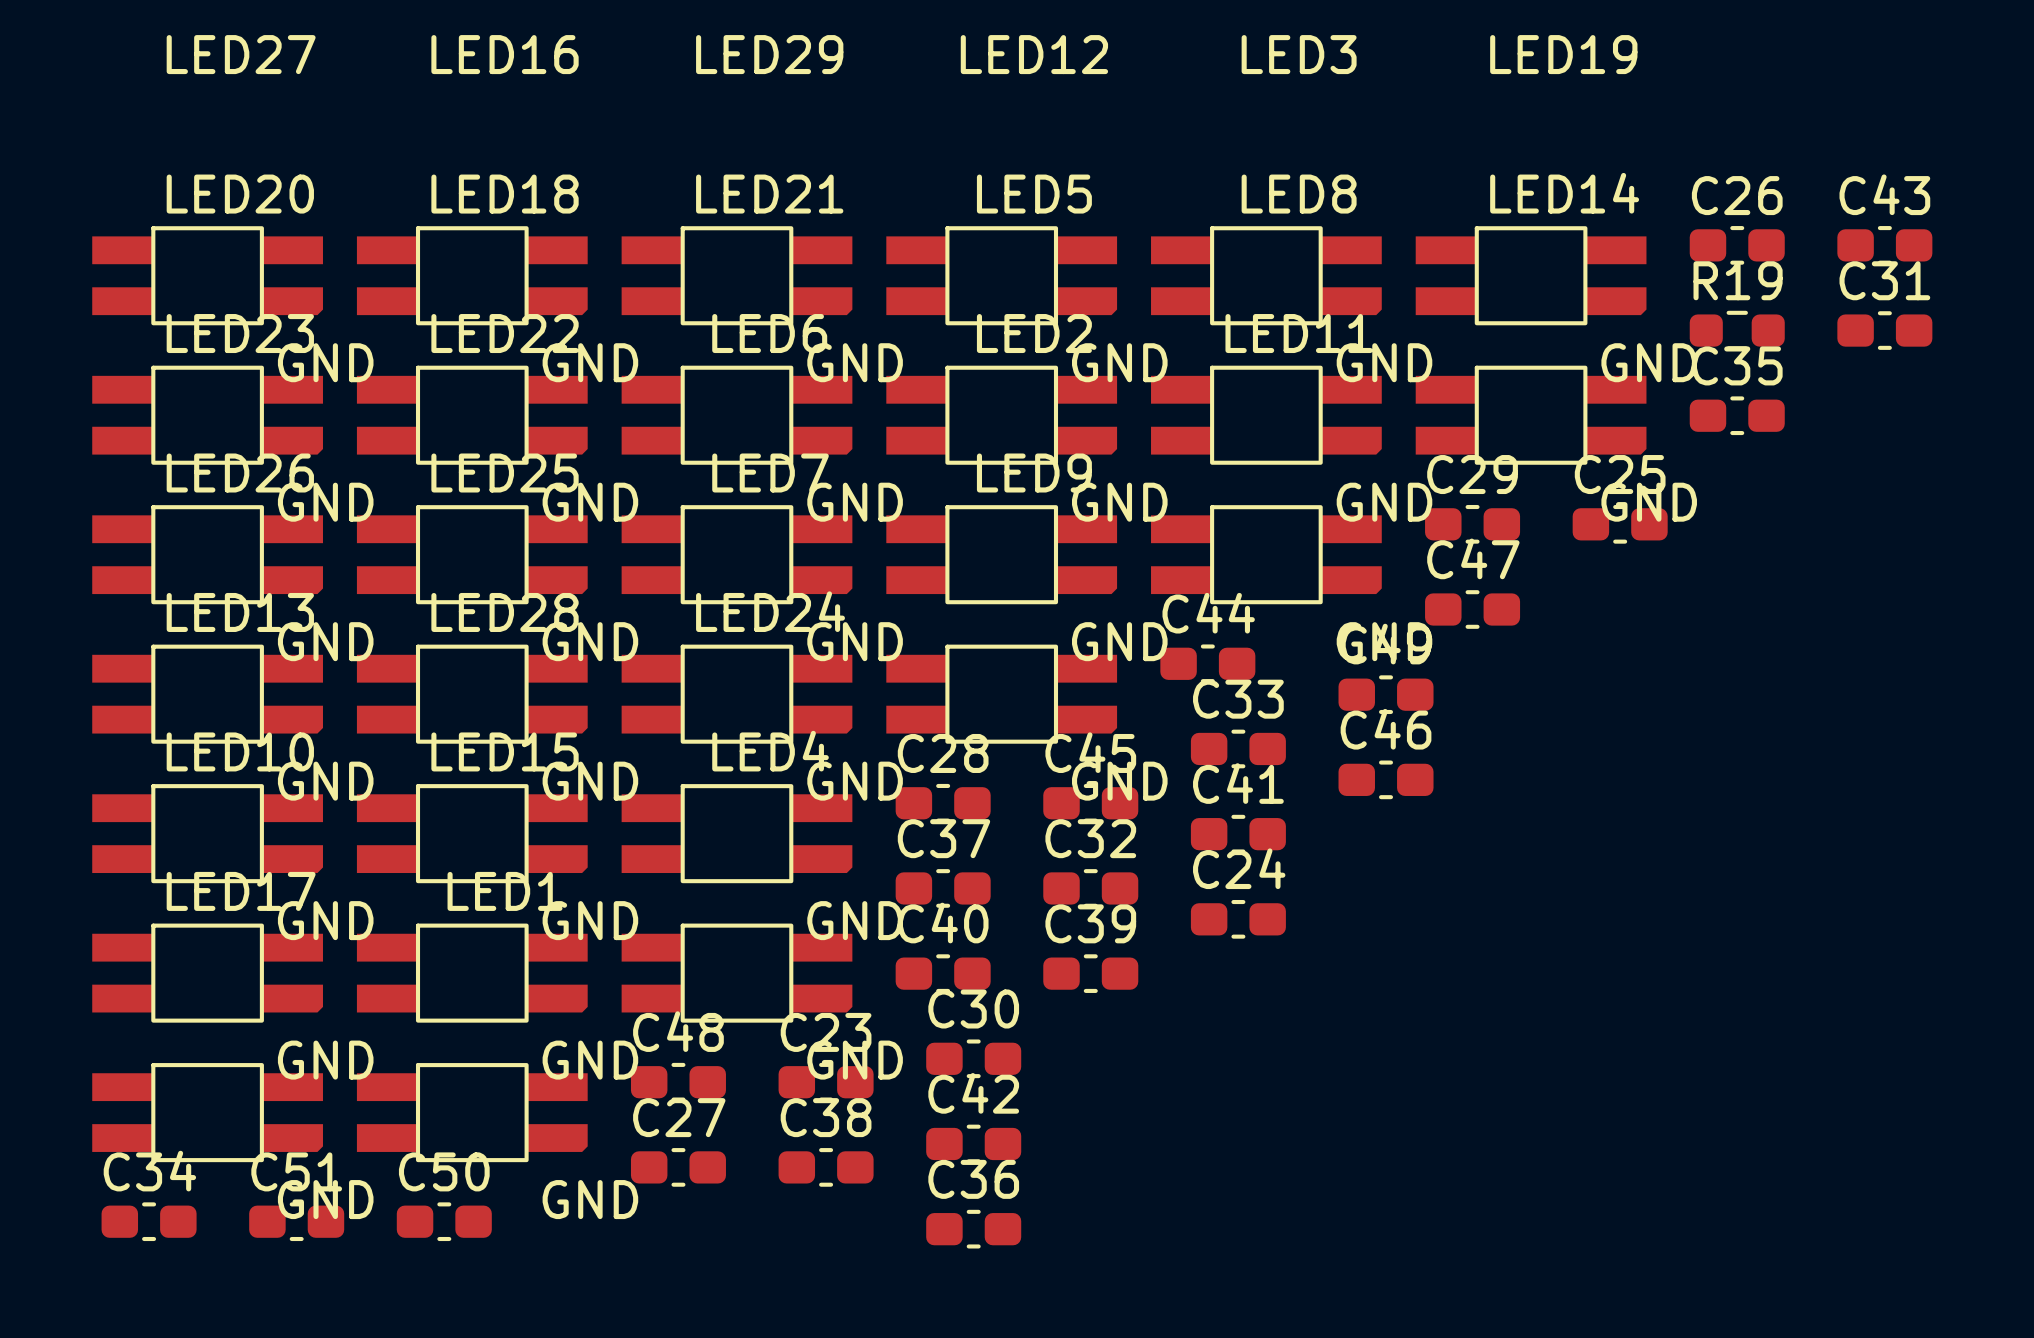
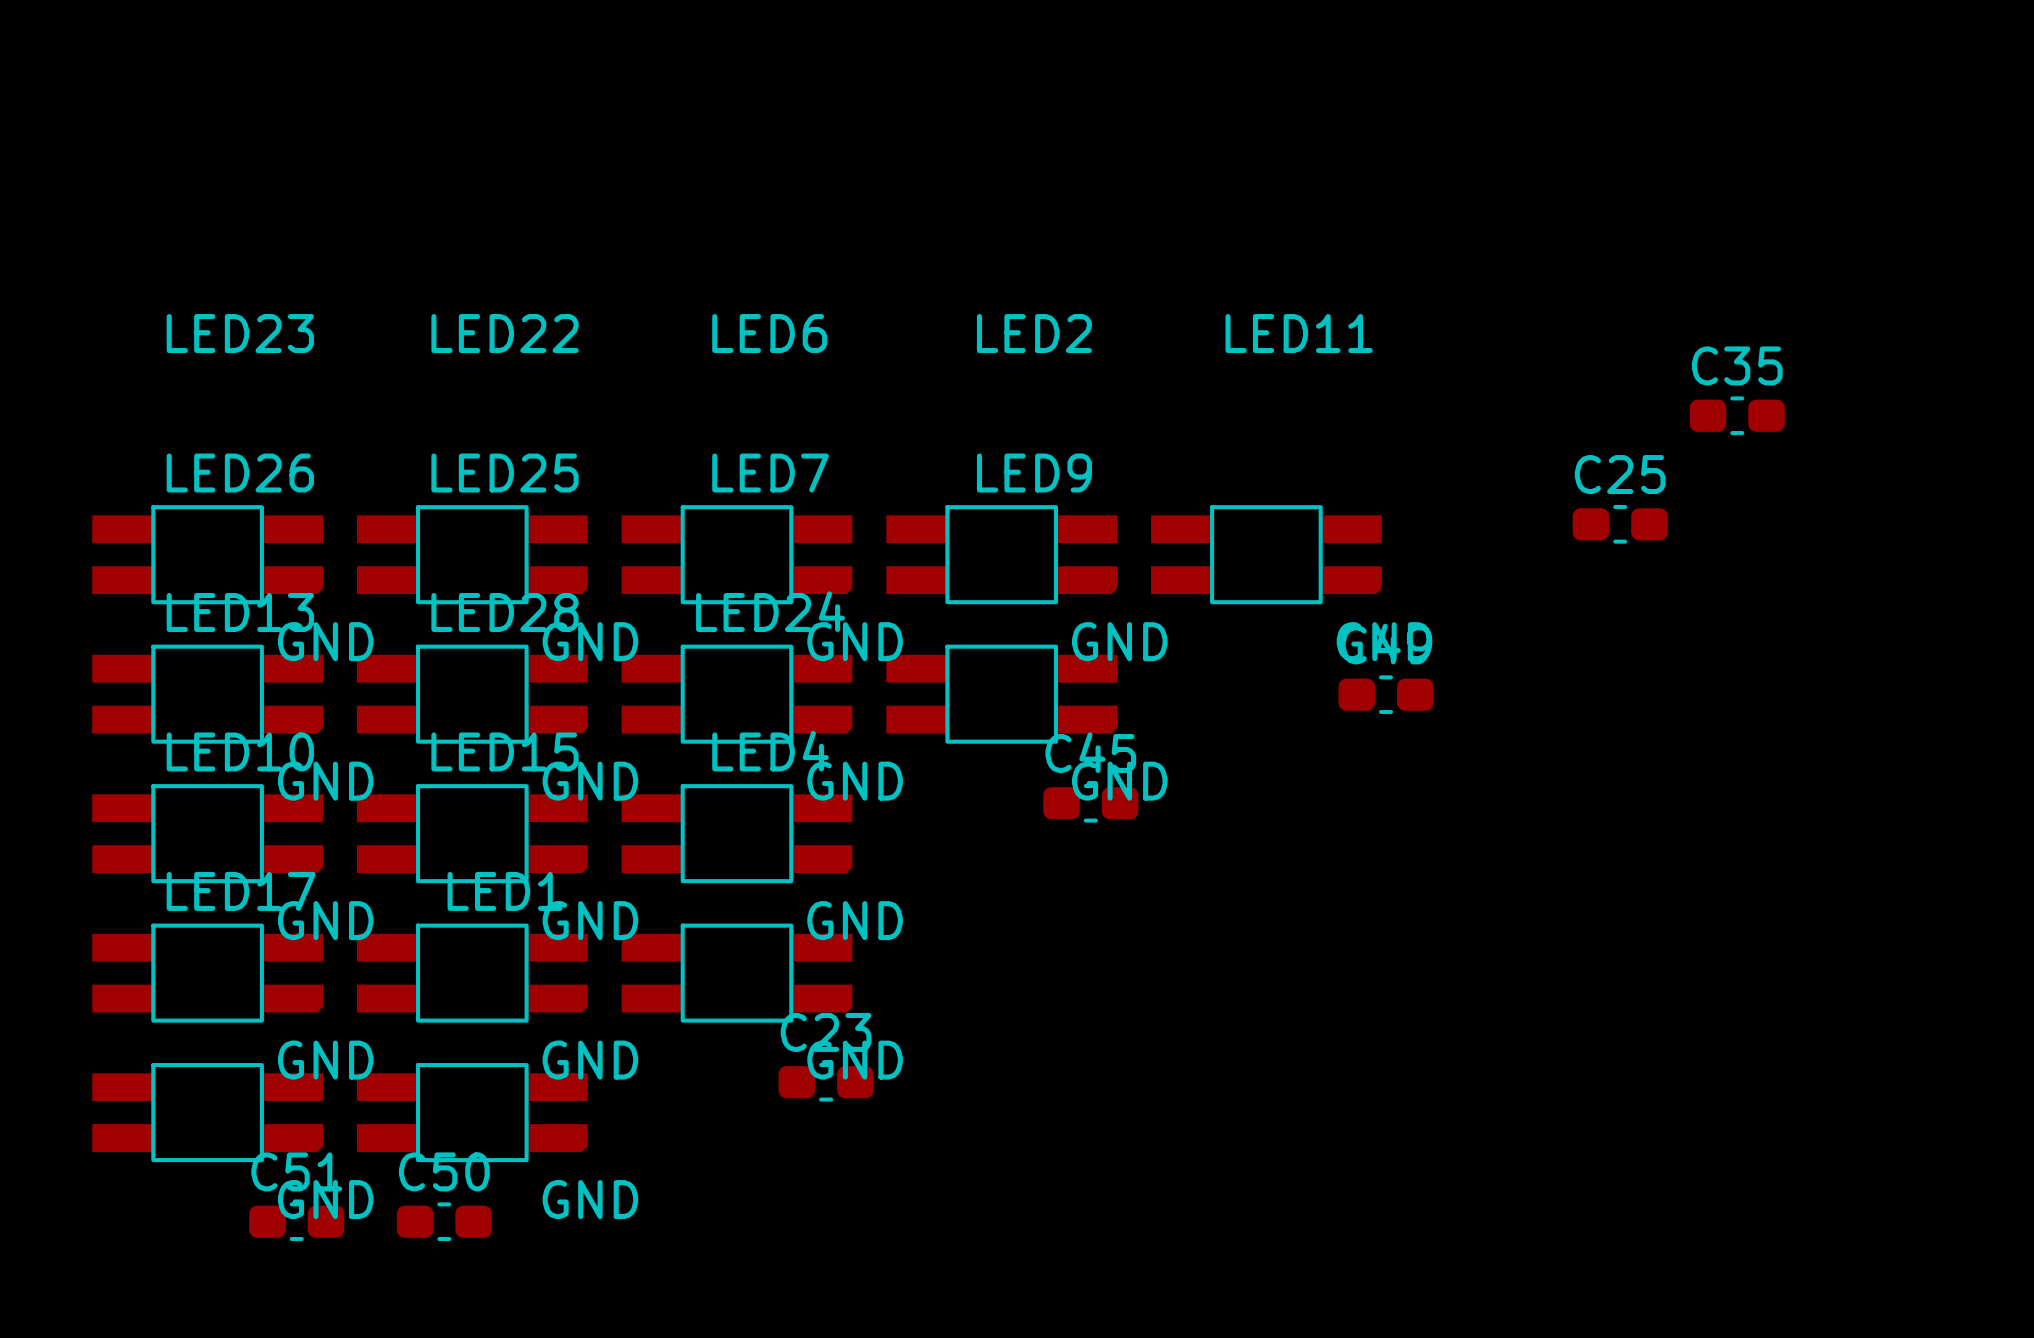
C26: (1737, 245) -> none
C43: (1884, 245) -> none
LED27: (207, 275) -> none
LED16: (472, 275) -> none
LED29: (737, 275) -> none
LED12: (1001, 275) -> none
LED3: (1266, 275) -> none
LED19: (1531, 275) -> none
R19: (1737, 330) -> none
C31: (1884, 330) -> none
LED20: (207, 415) -> none
LED18: (472, 415) -> none
LED21: (737, 415) -> none
LED5: (1001, 415) -> none
LED8: (1266, 415) -> none
LED14: (1531, 415) -> none
C29: (1472, 524) -> none
C47: (1472, 609) -> none
C44: (1207, 663) -> none
C33: (1238, 748) -> none
C46: (1386, 779) -> none
C28: (943, 803) -> none
C41: (1238, 834) -> none
C37: (943, 888) -> none
C32: (1090, 888) -> none
C24: (1238, 919) -> none
C40: (943, 973) -> none
C39: (1090, 973) -> none
C30: (973, 1058) -> none
C48: (678, 1082) -> none
C42: (973, 1143) -> none
C27: (678, 1167) -> none
C38: (826, 1167) -> none
C34: (149, 1221) -> none
C36: (973, 1229) -> none

